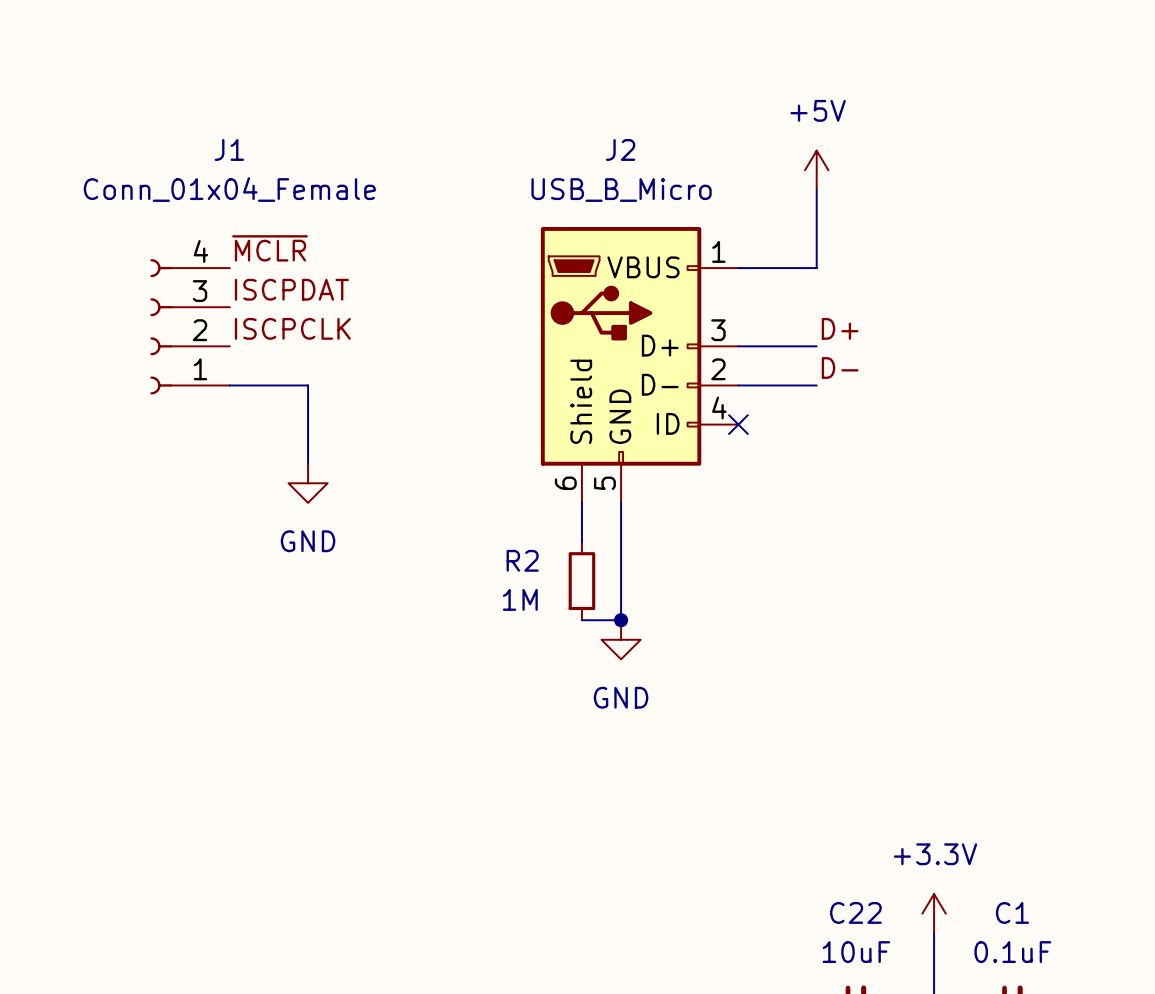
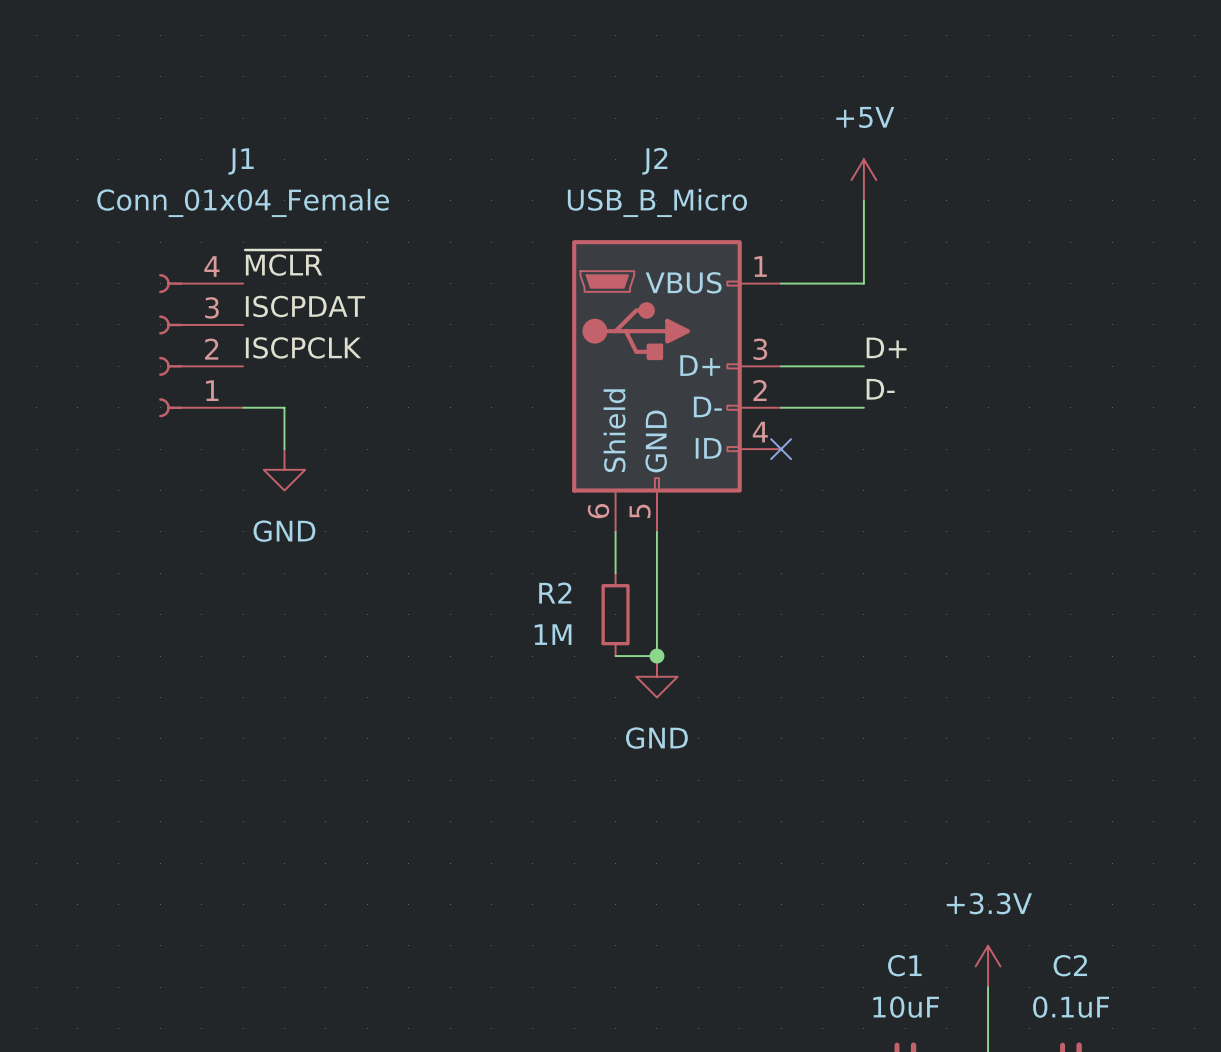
wire: (268, 385) (308, 385) (308, 463) -> (284, 407) (284, 449)
power symbol position: GND (308, 483) -> GND (284, 469)
C22 name: C22 (855, 912) -> C1 (904, 965)
C1 name: C1 (1012, 912) -> C2 (1070, 965)

